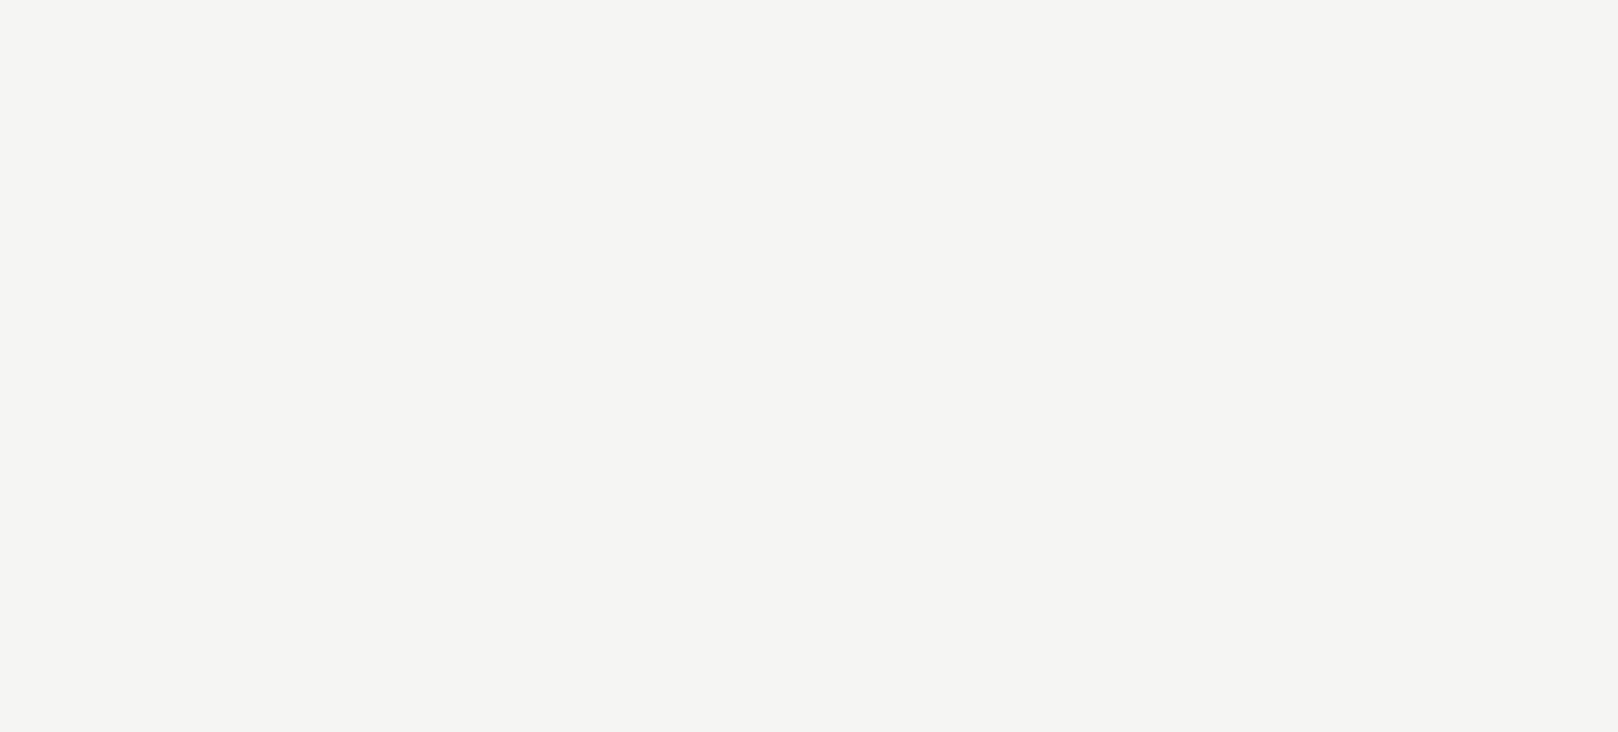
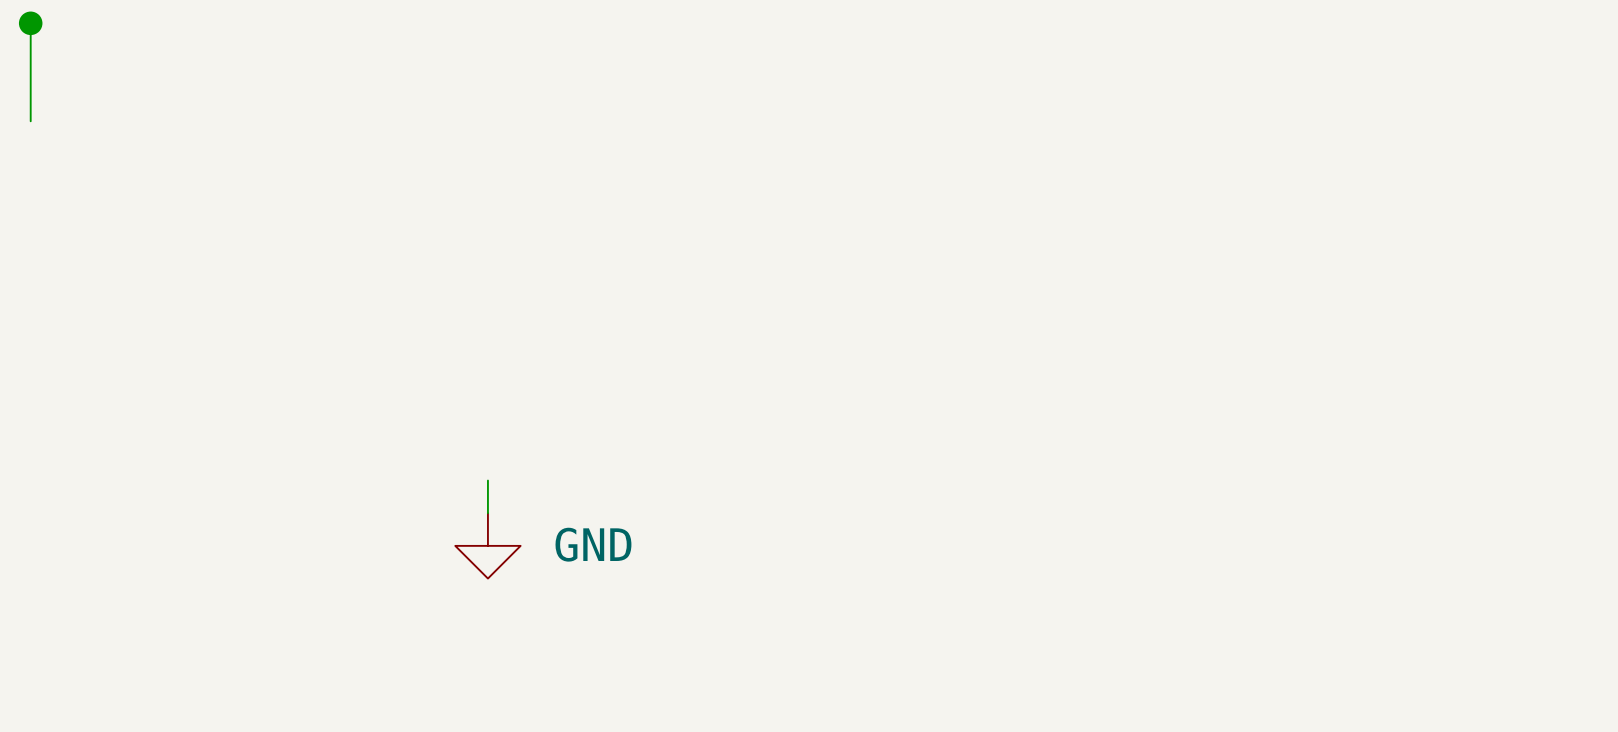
wire: none -> (30, 23) (30, 121)
junction: none -> (30, 23)
wire: none -> (487, 480) (487, 513)
power symbol: none -> GND (487, 545)

